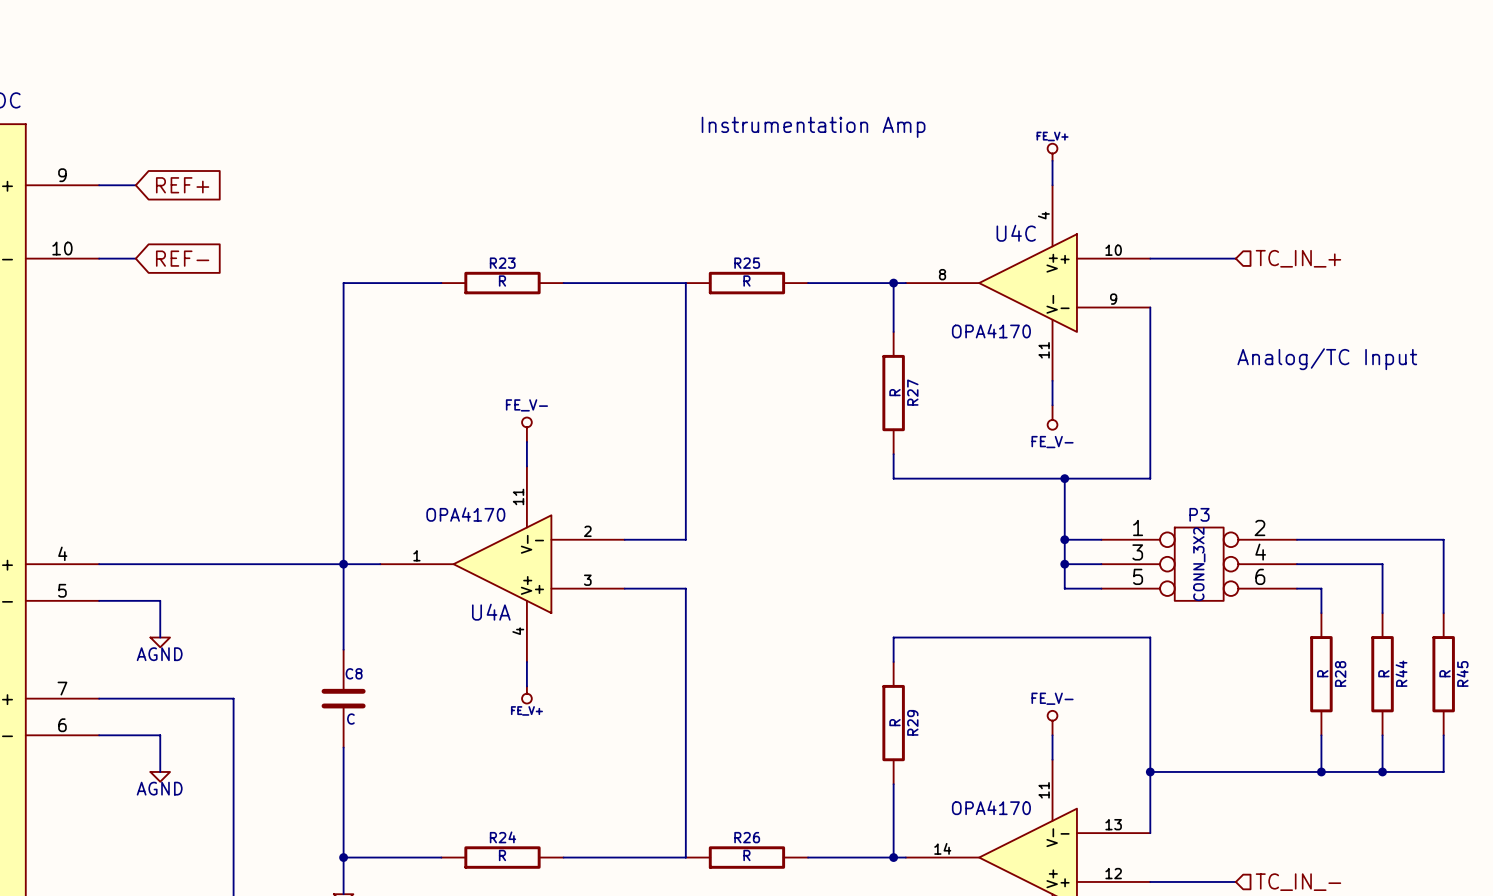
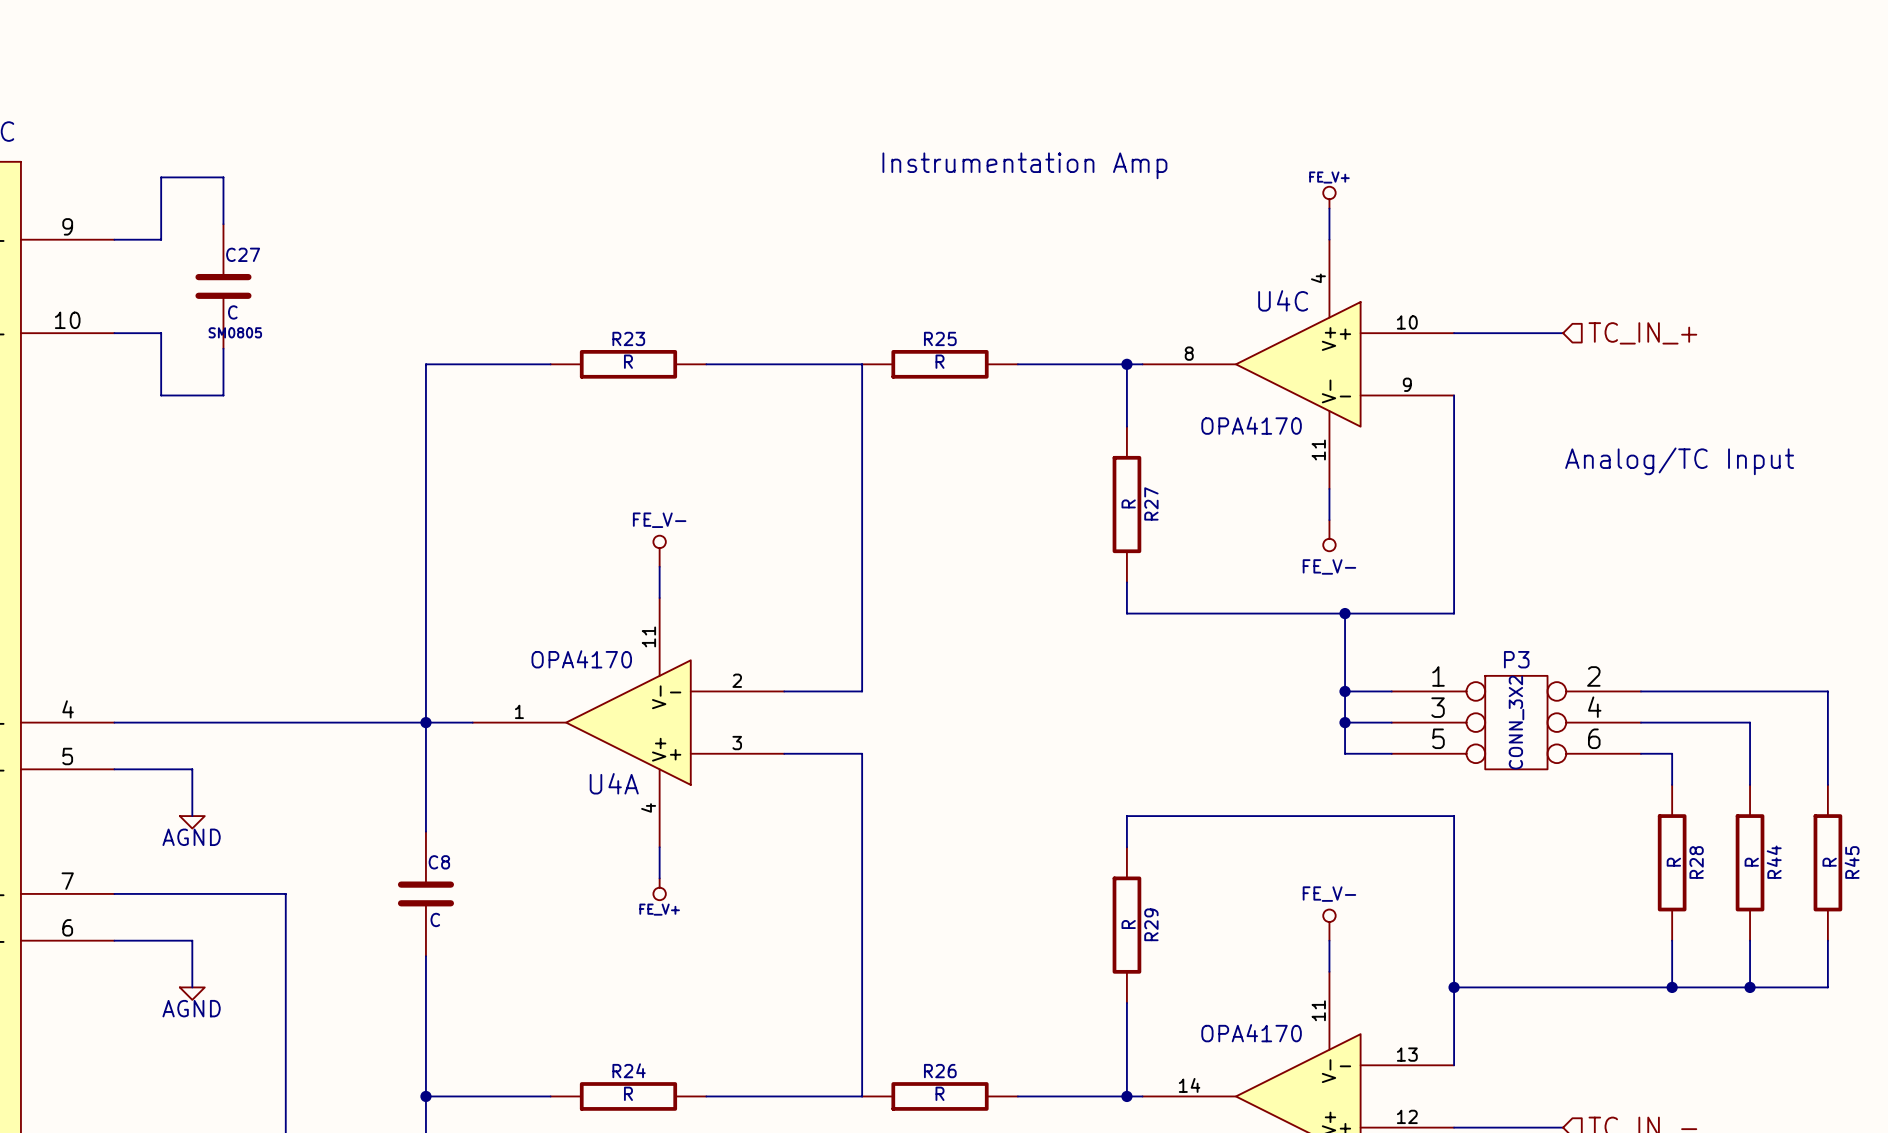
wire: none -> (223, 224) (223, 177) (161, 177) (161, 239)
global label: REF+ (182, 185) -> none
C27: none -> C (223, 286)
wire: none -> (161, 333) (161, 395) (223, 395) (223, 348)
global label: REF- (182, 258) -> none

